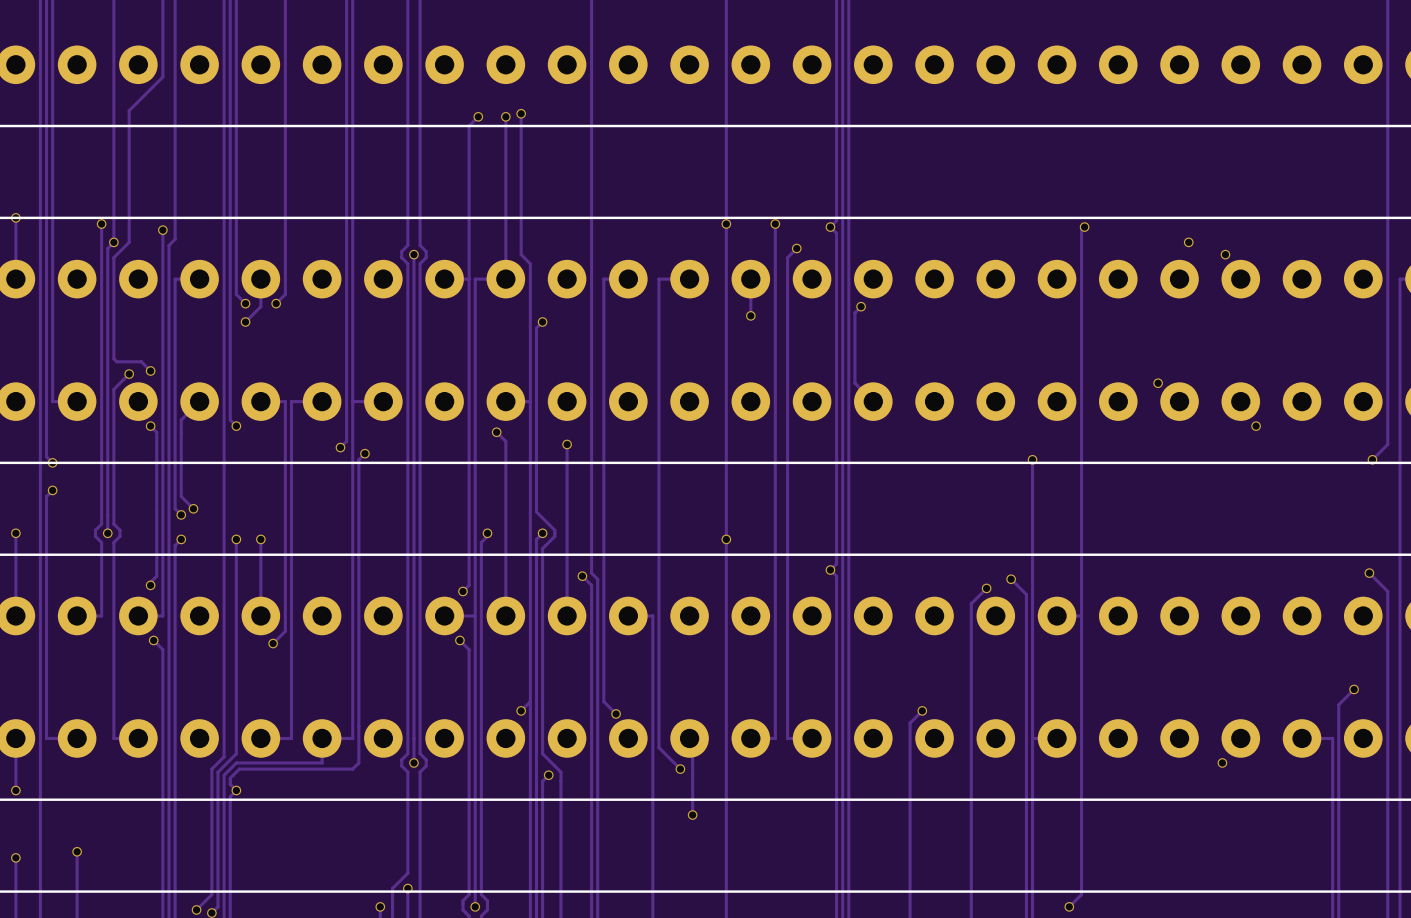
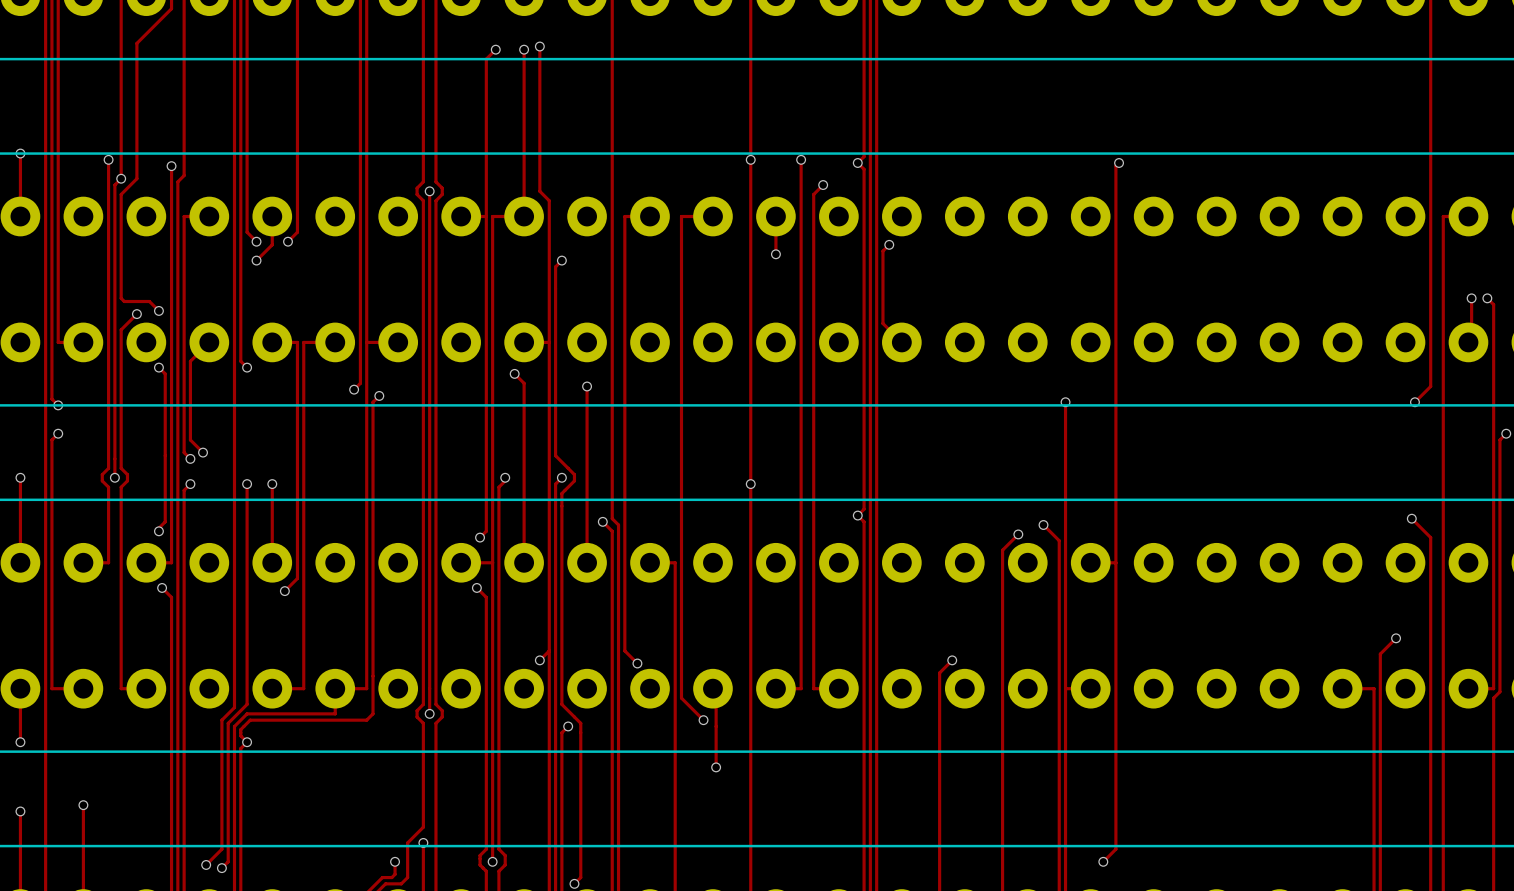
via: (1188, 242) -> none
via: (1225, 254) -> none
via: (1158, 383) -> none
via: (1256, 426) -> none
via: (1222, 762) -> none

